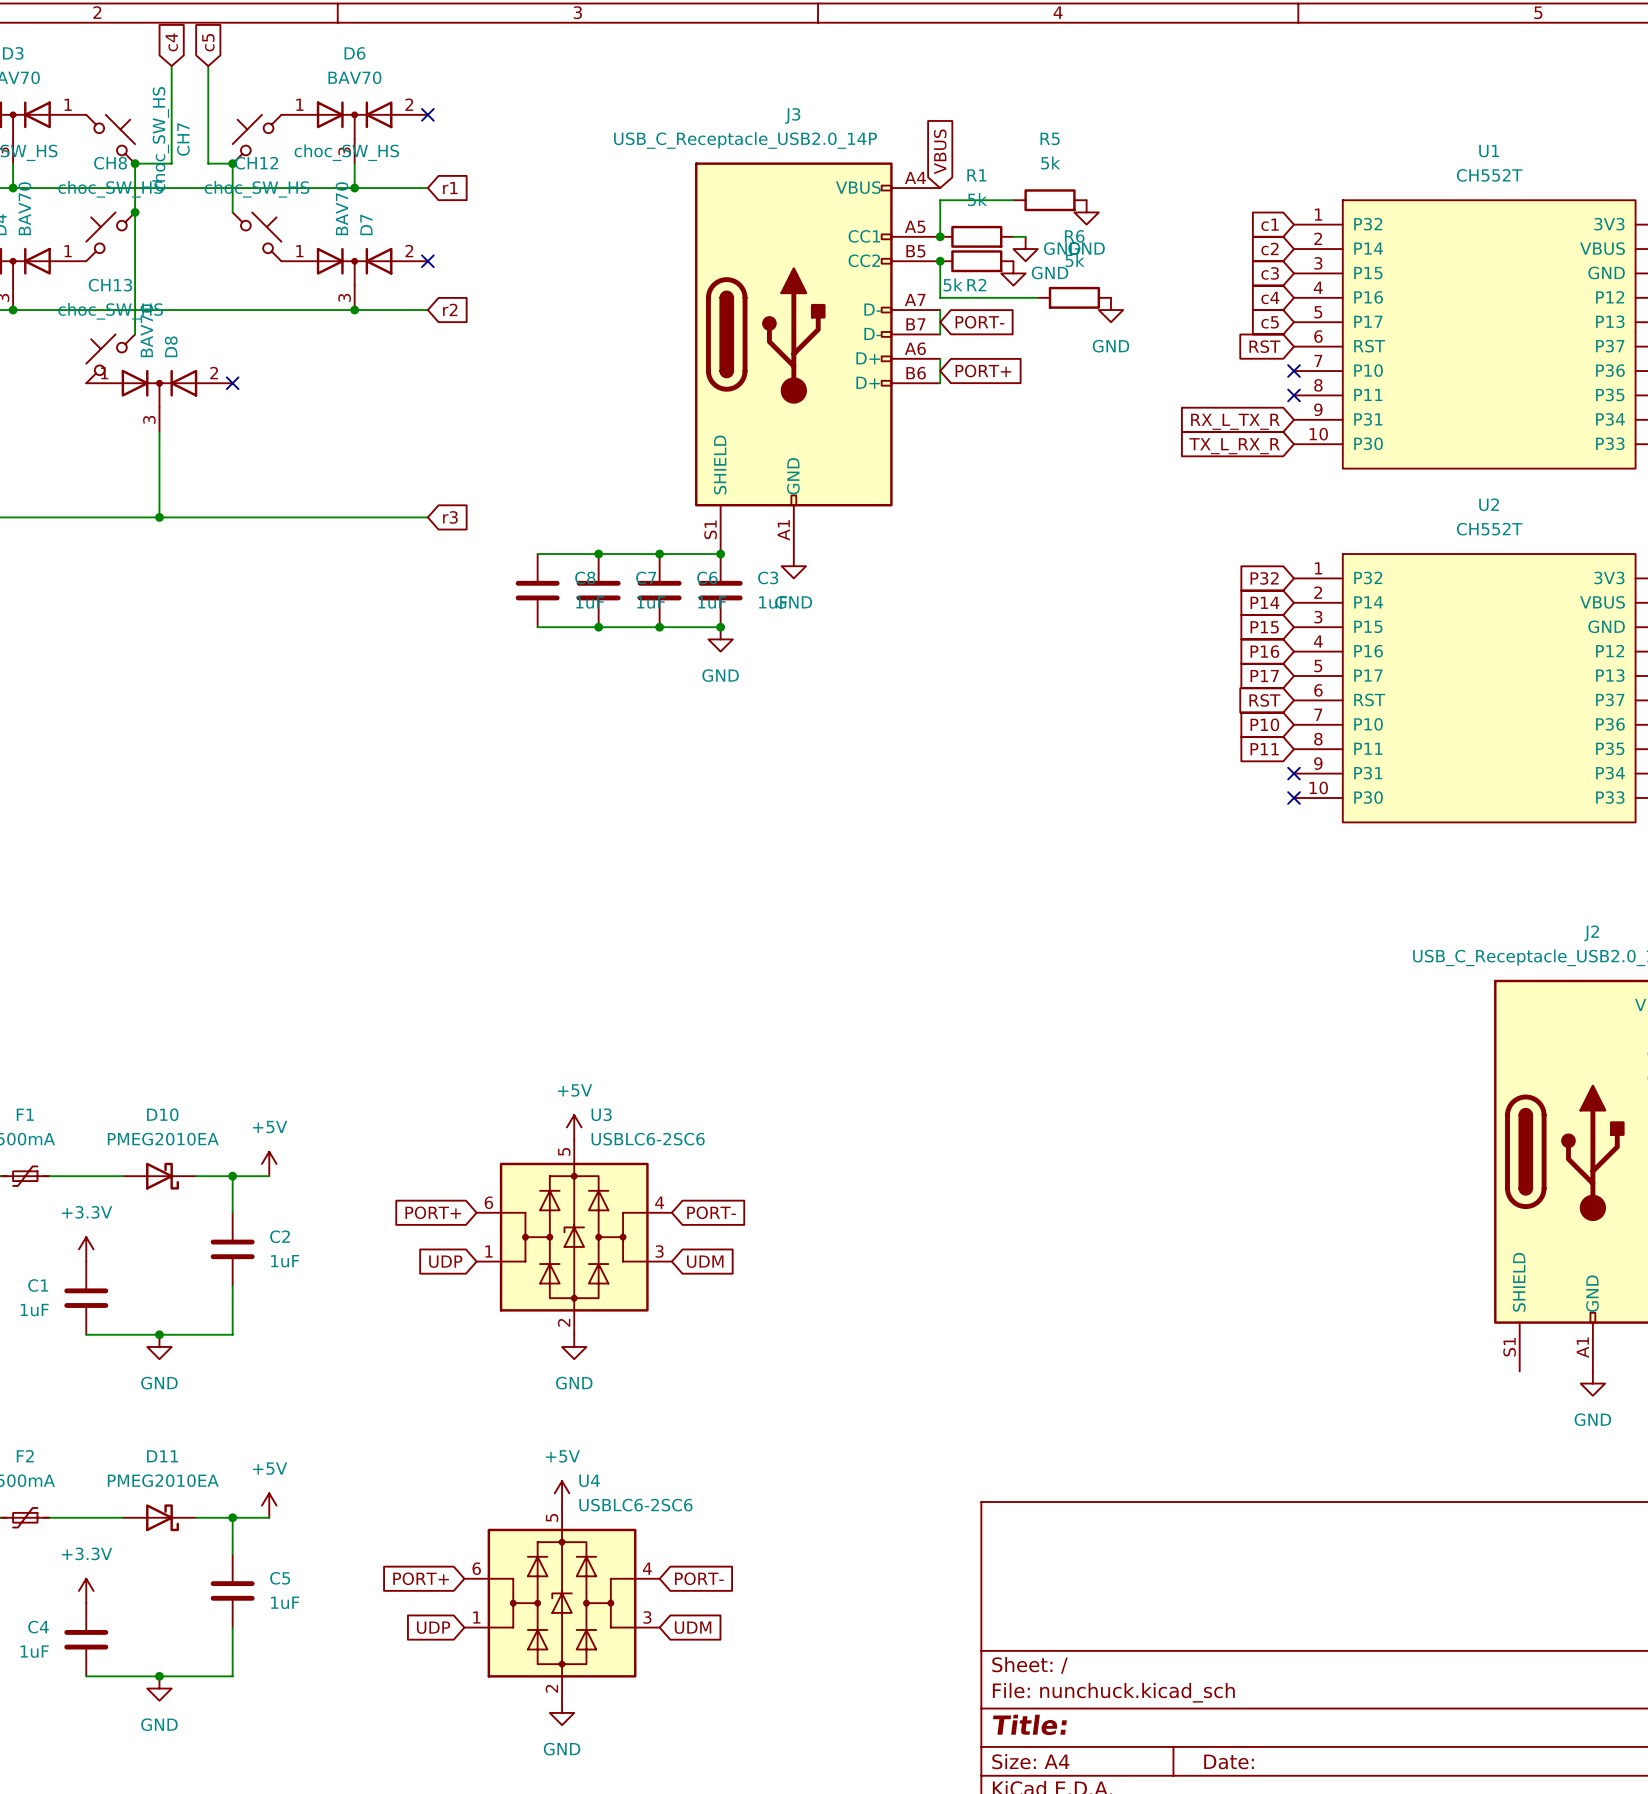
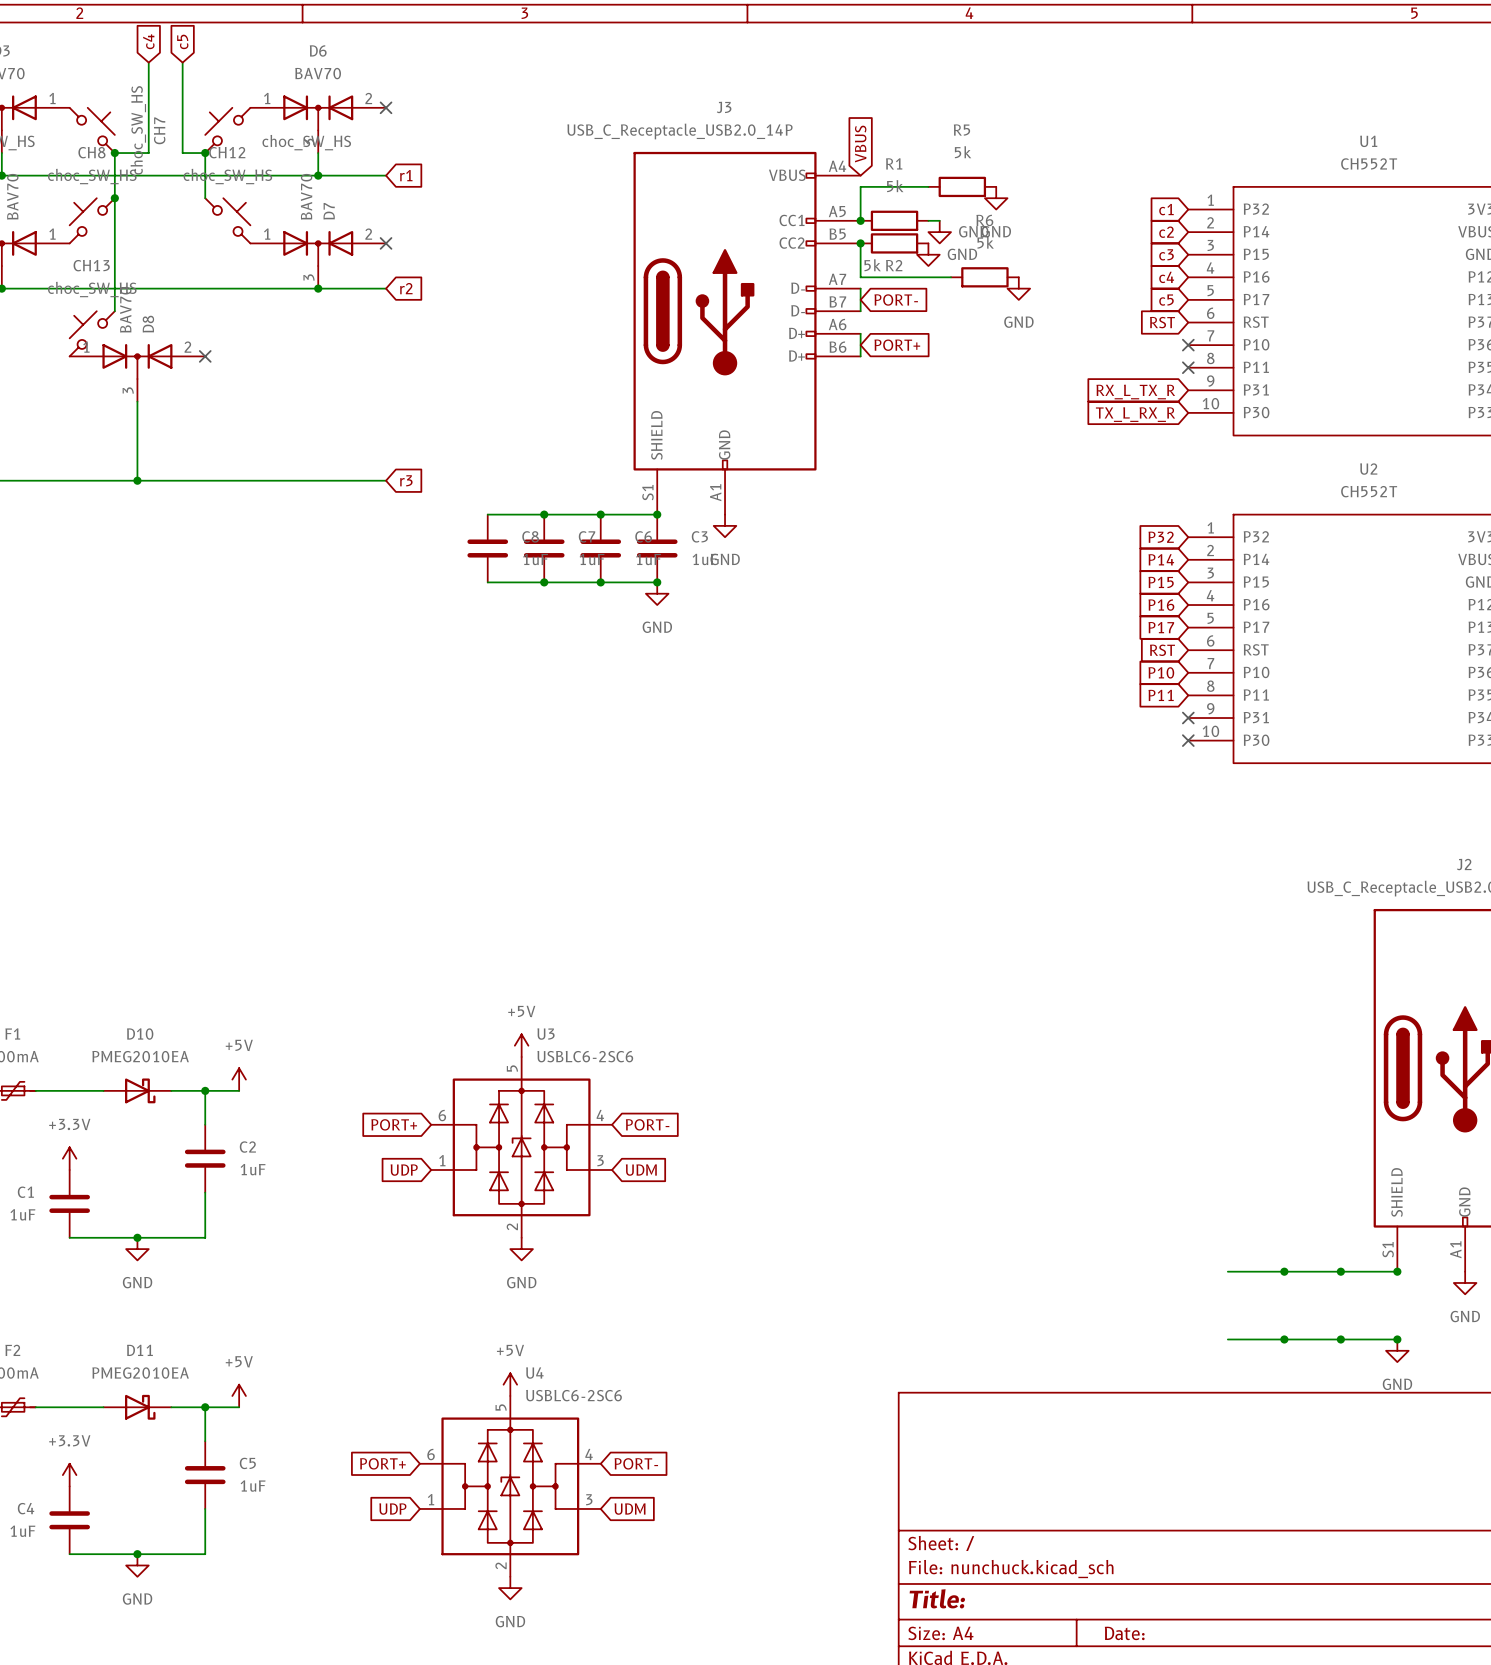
wire: none -> (1227, 1271) (1397, 1271)
junction: none -> (1284, 1271)
junction: none -> (1340, 1271)
junction: none -> (1397, 1271)
wire: none -> (1227, 1339) (1397, 1339)
junction: none -> (1284, 1339)
junction: none -> (1340, 1339)
junction: none -> (1397, 1339)
power symbol: none -> GND (1397, 1350)

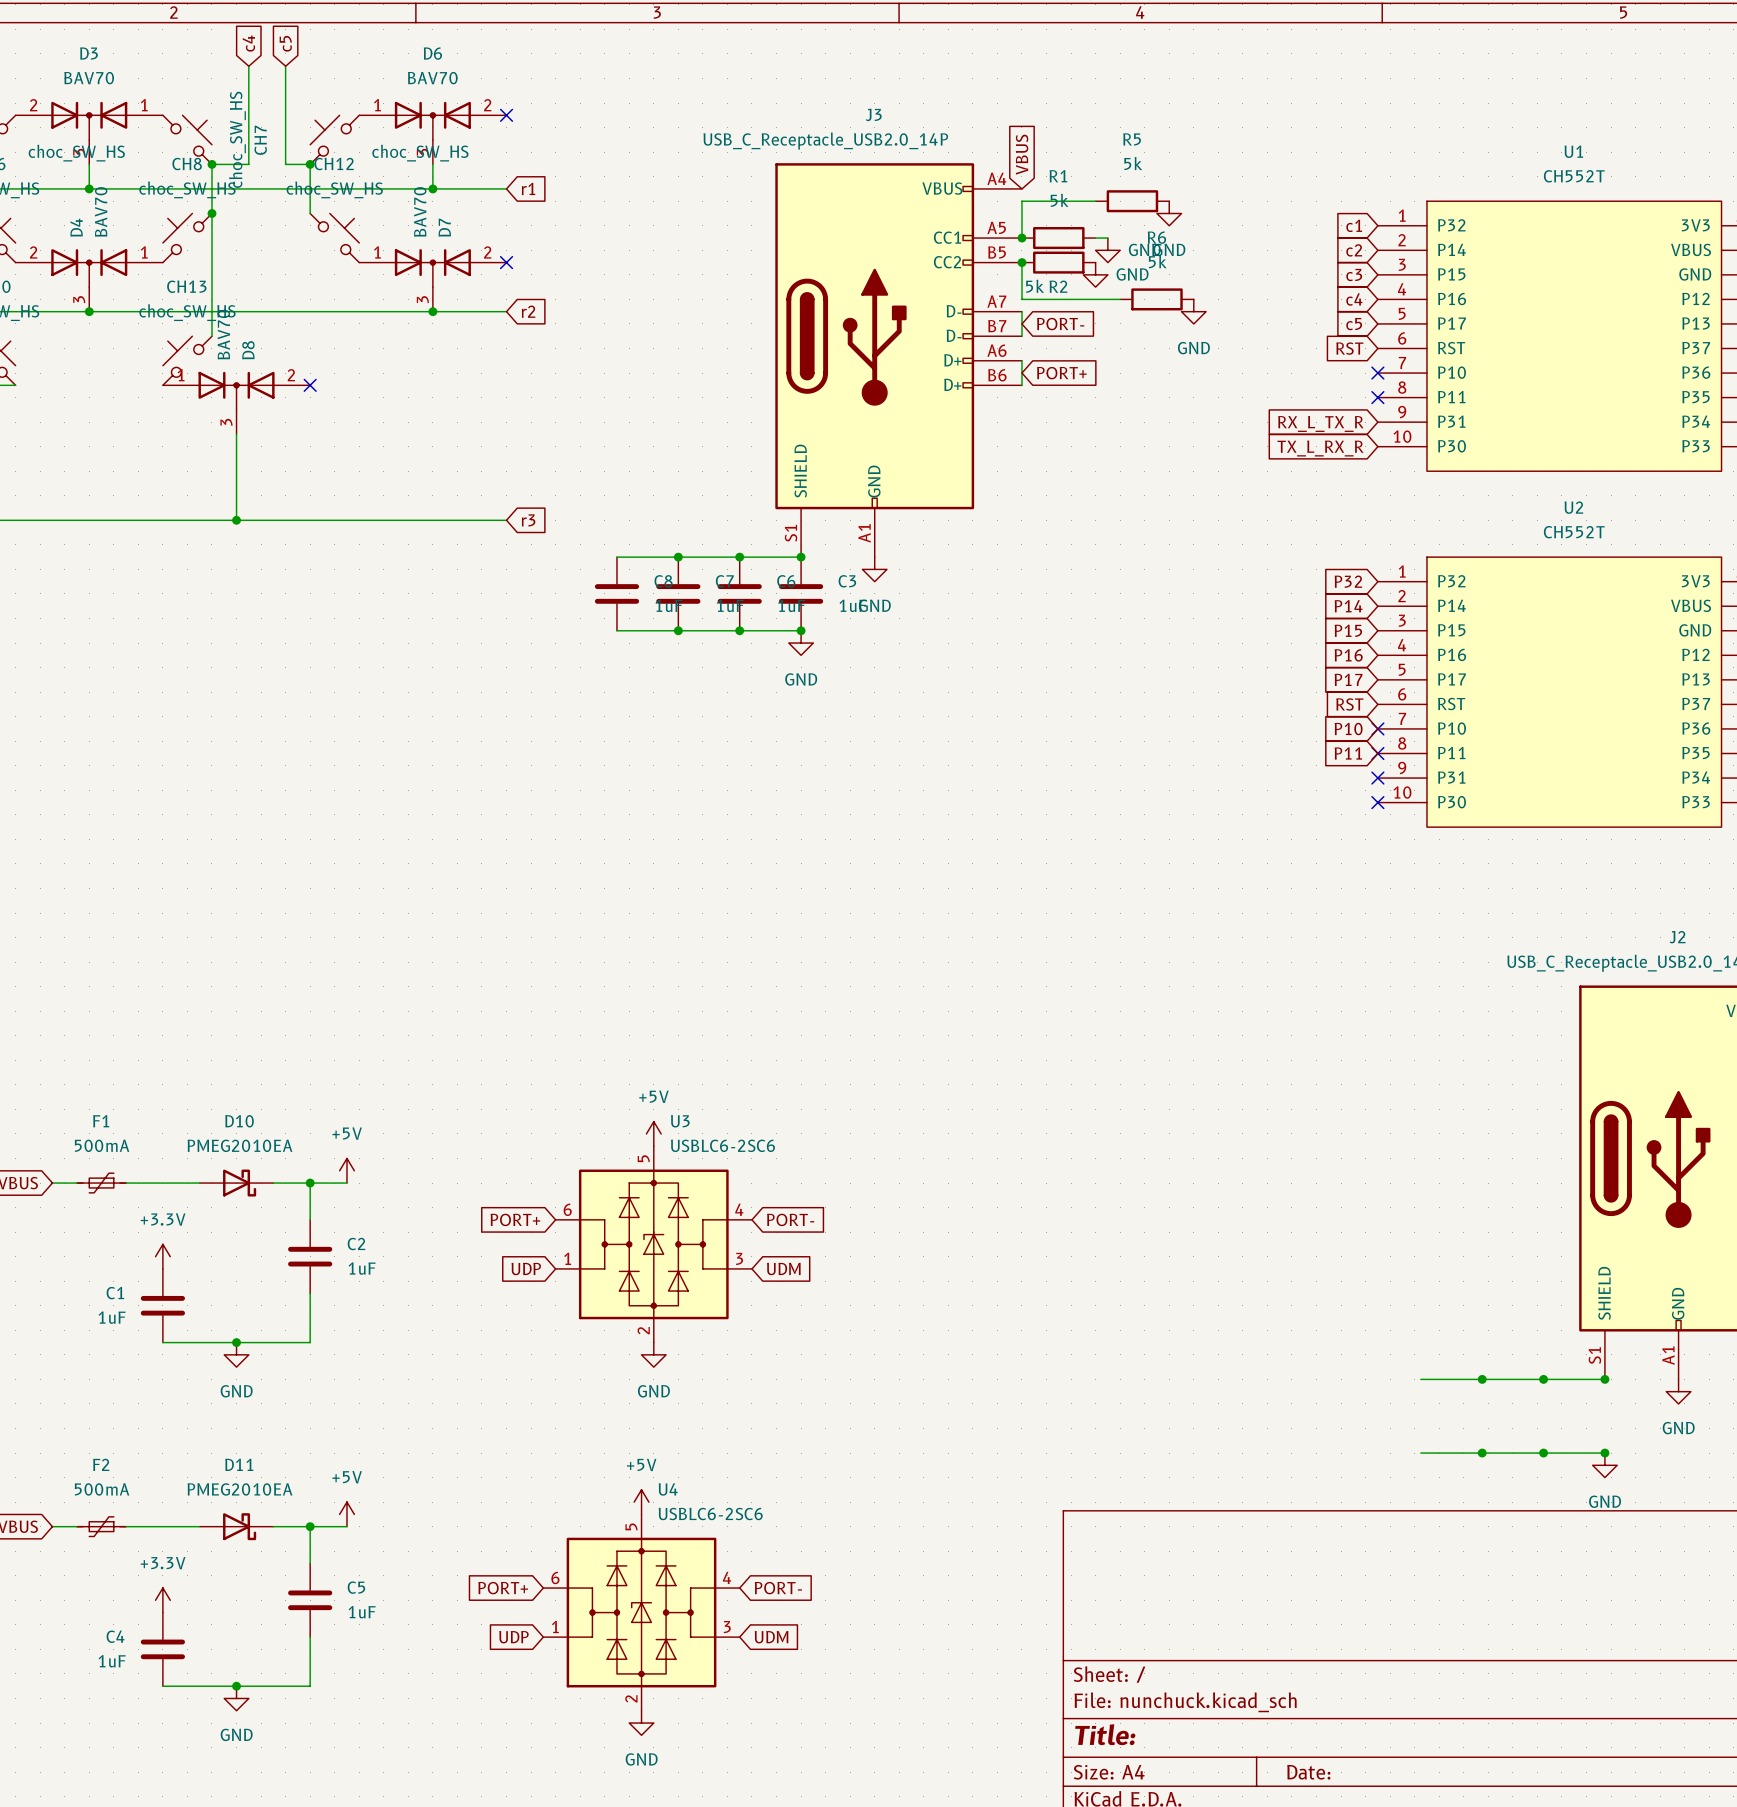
no-connect mark: none -> (1377, 728)
no-connect mark: none -> (1377, 753)

